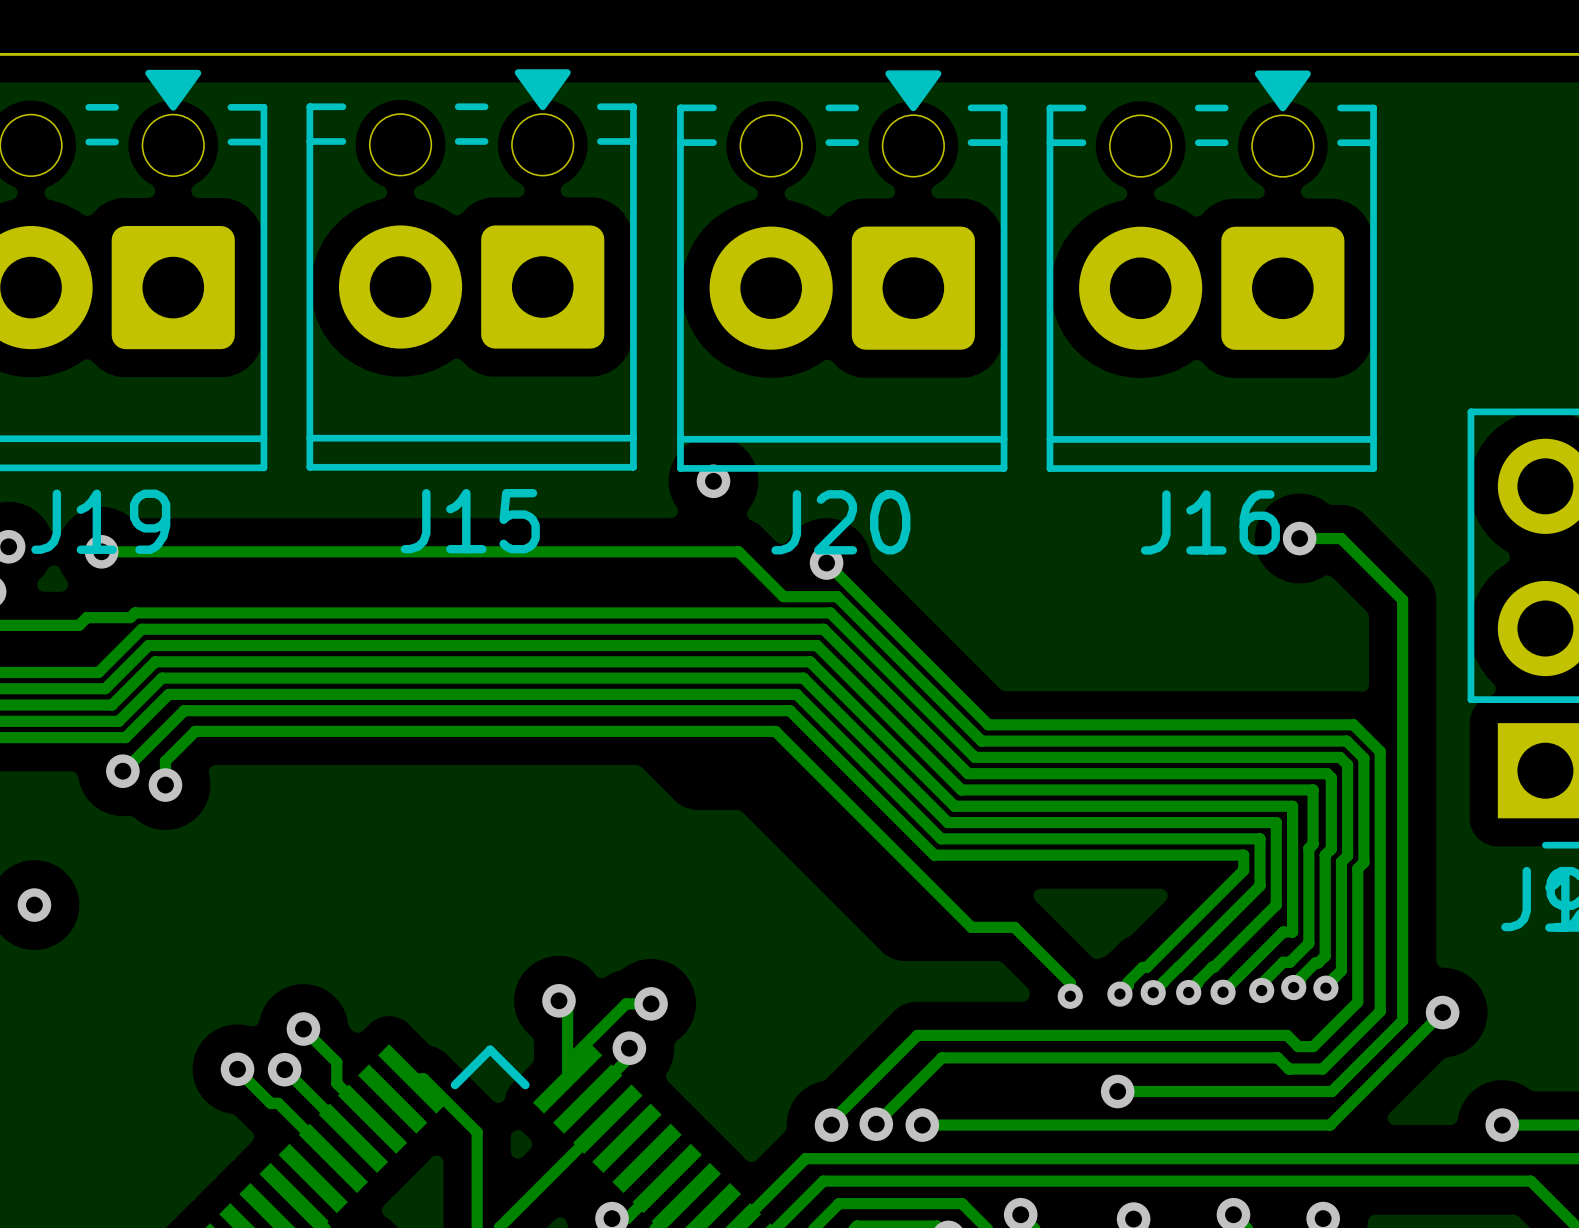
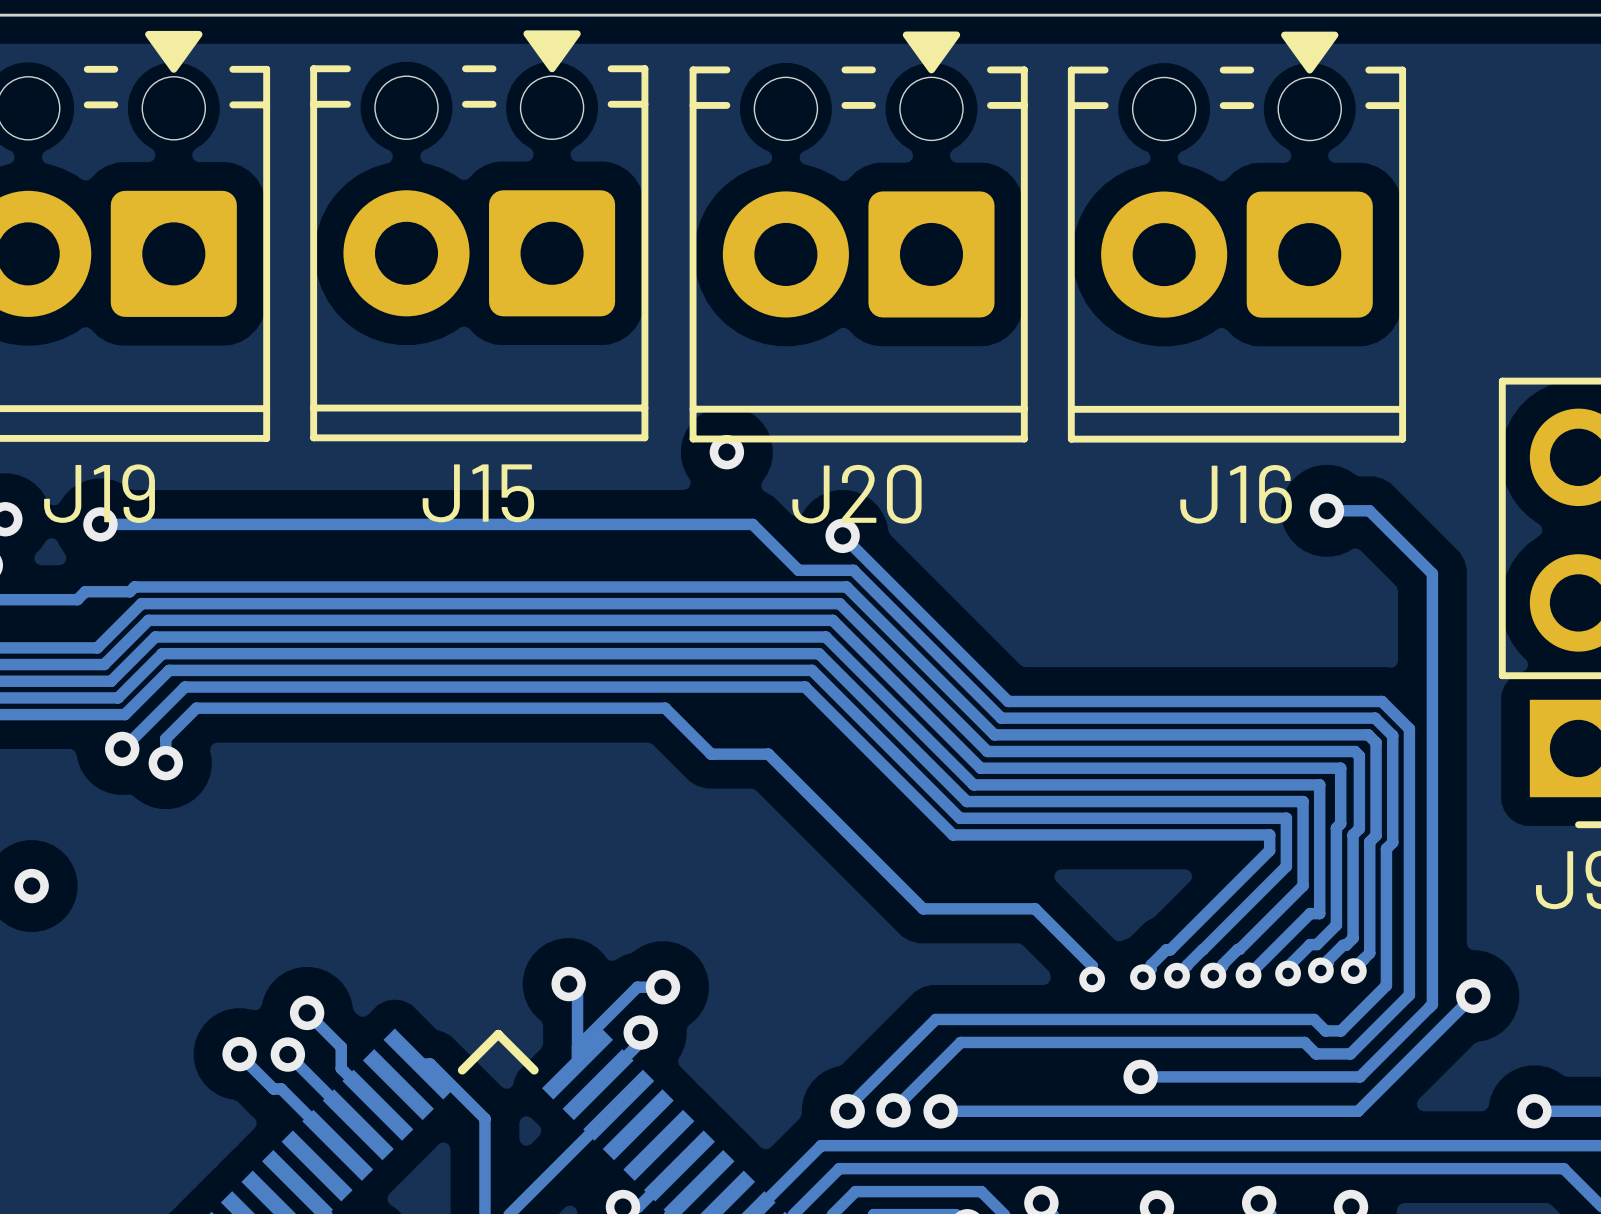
track: (653, 731) (775, 731) (971, 927) -> (665, 708) (711, 754) (768, 754) (923, 908) (990, 908)

